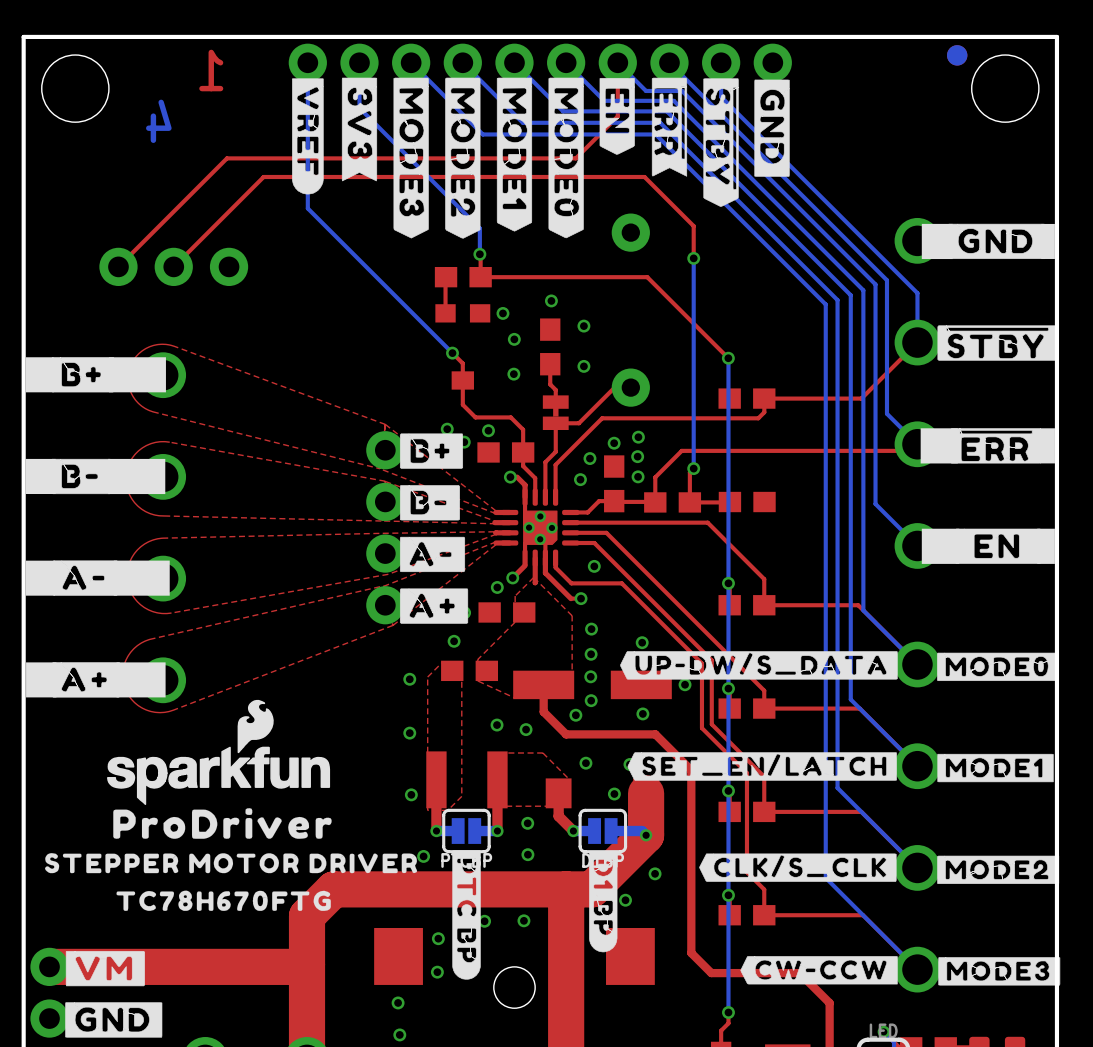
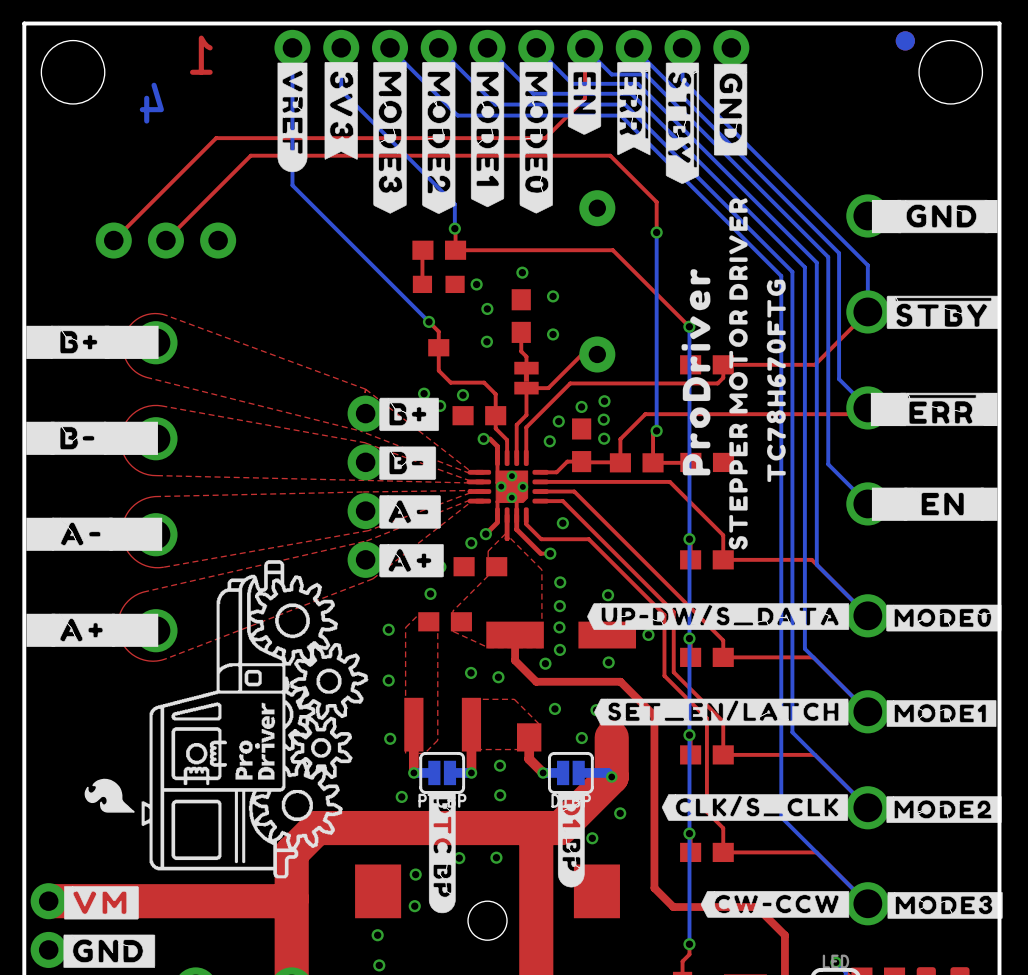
drawing: none -> [681, 198, 786, 550]
drawing: none -> [84, 560, 369, 879]
drawing: [44, 699, 418, 911] -> none

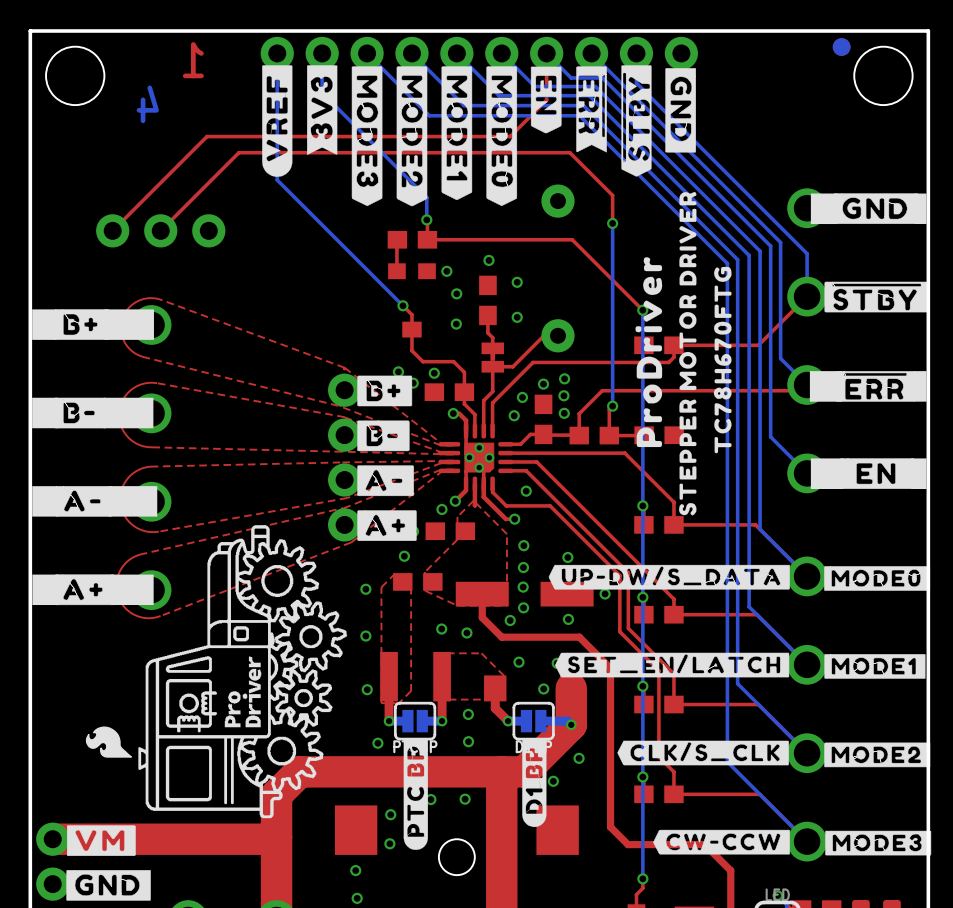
drawing shape: [277, 62, 308, 173] -> [262, 65, 293, 177]
drawing shape: [324, 62, 358, 160] -> [307, 65, 338, 155]
drawing shape: [665, 62, 700, 184] -> [621, 65, 652, 177]
drawing shape: [428, 791, 456, 914] -> [403, 737, 428, 850]
drawing shape: [557, 791, 585, 888] -> [522, 739, 547, 828]

